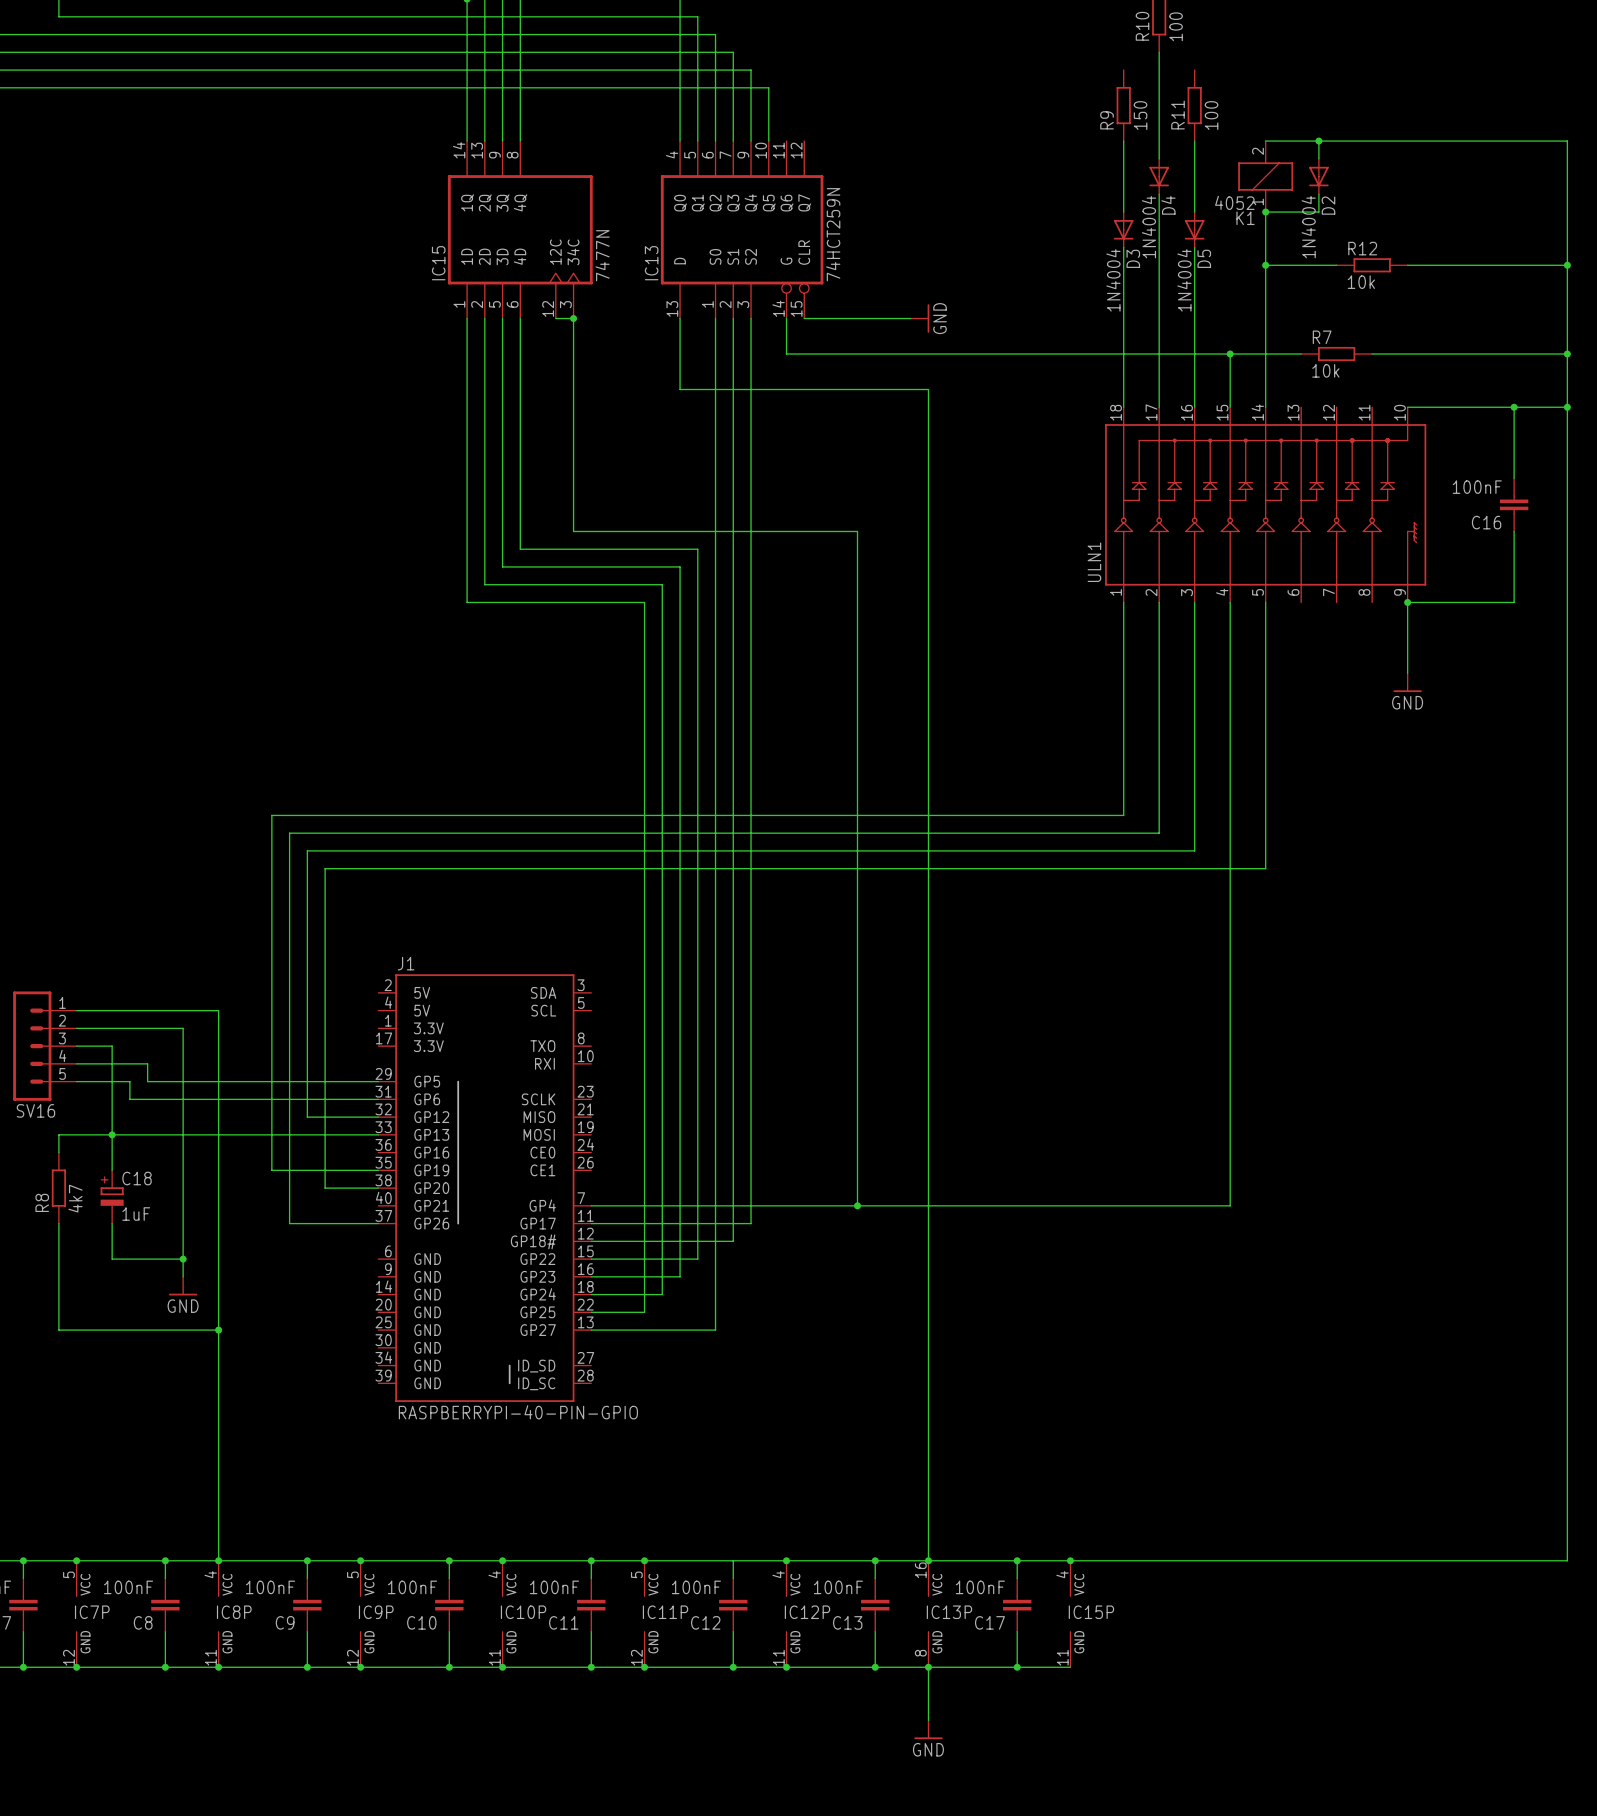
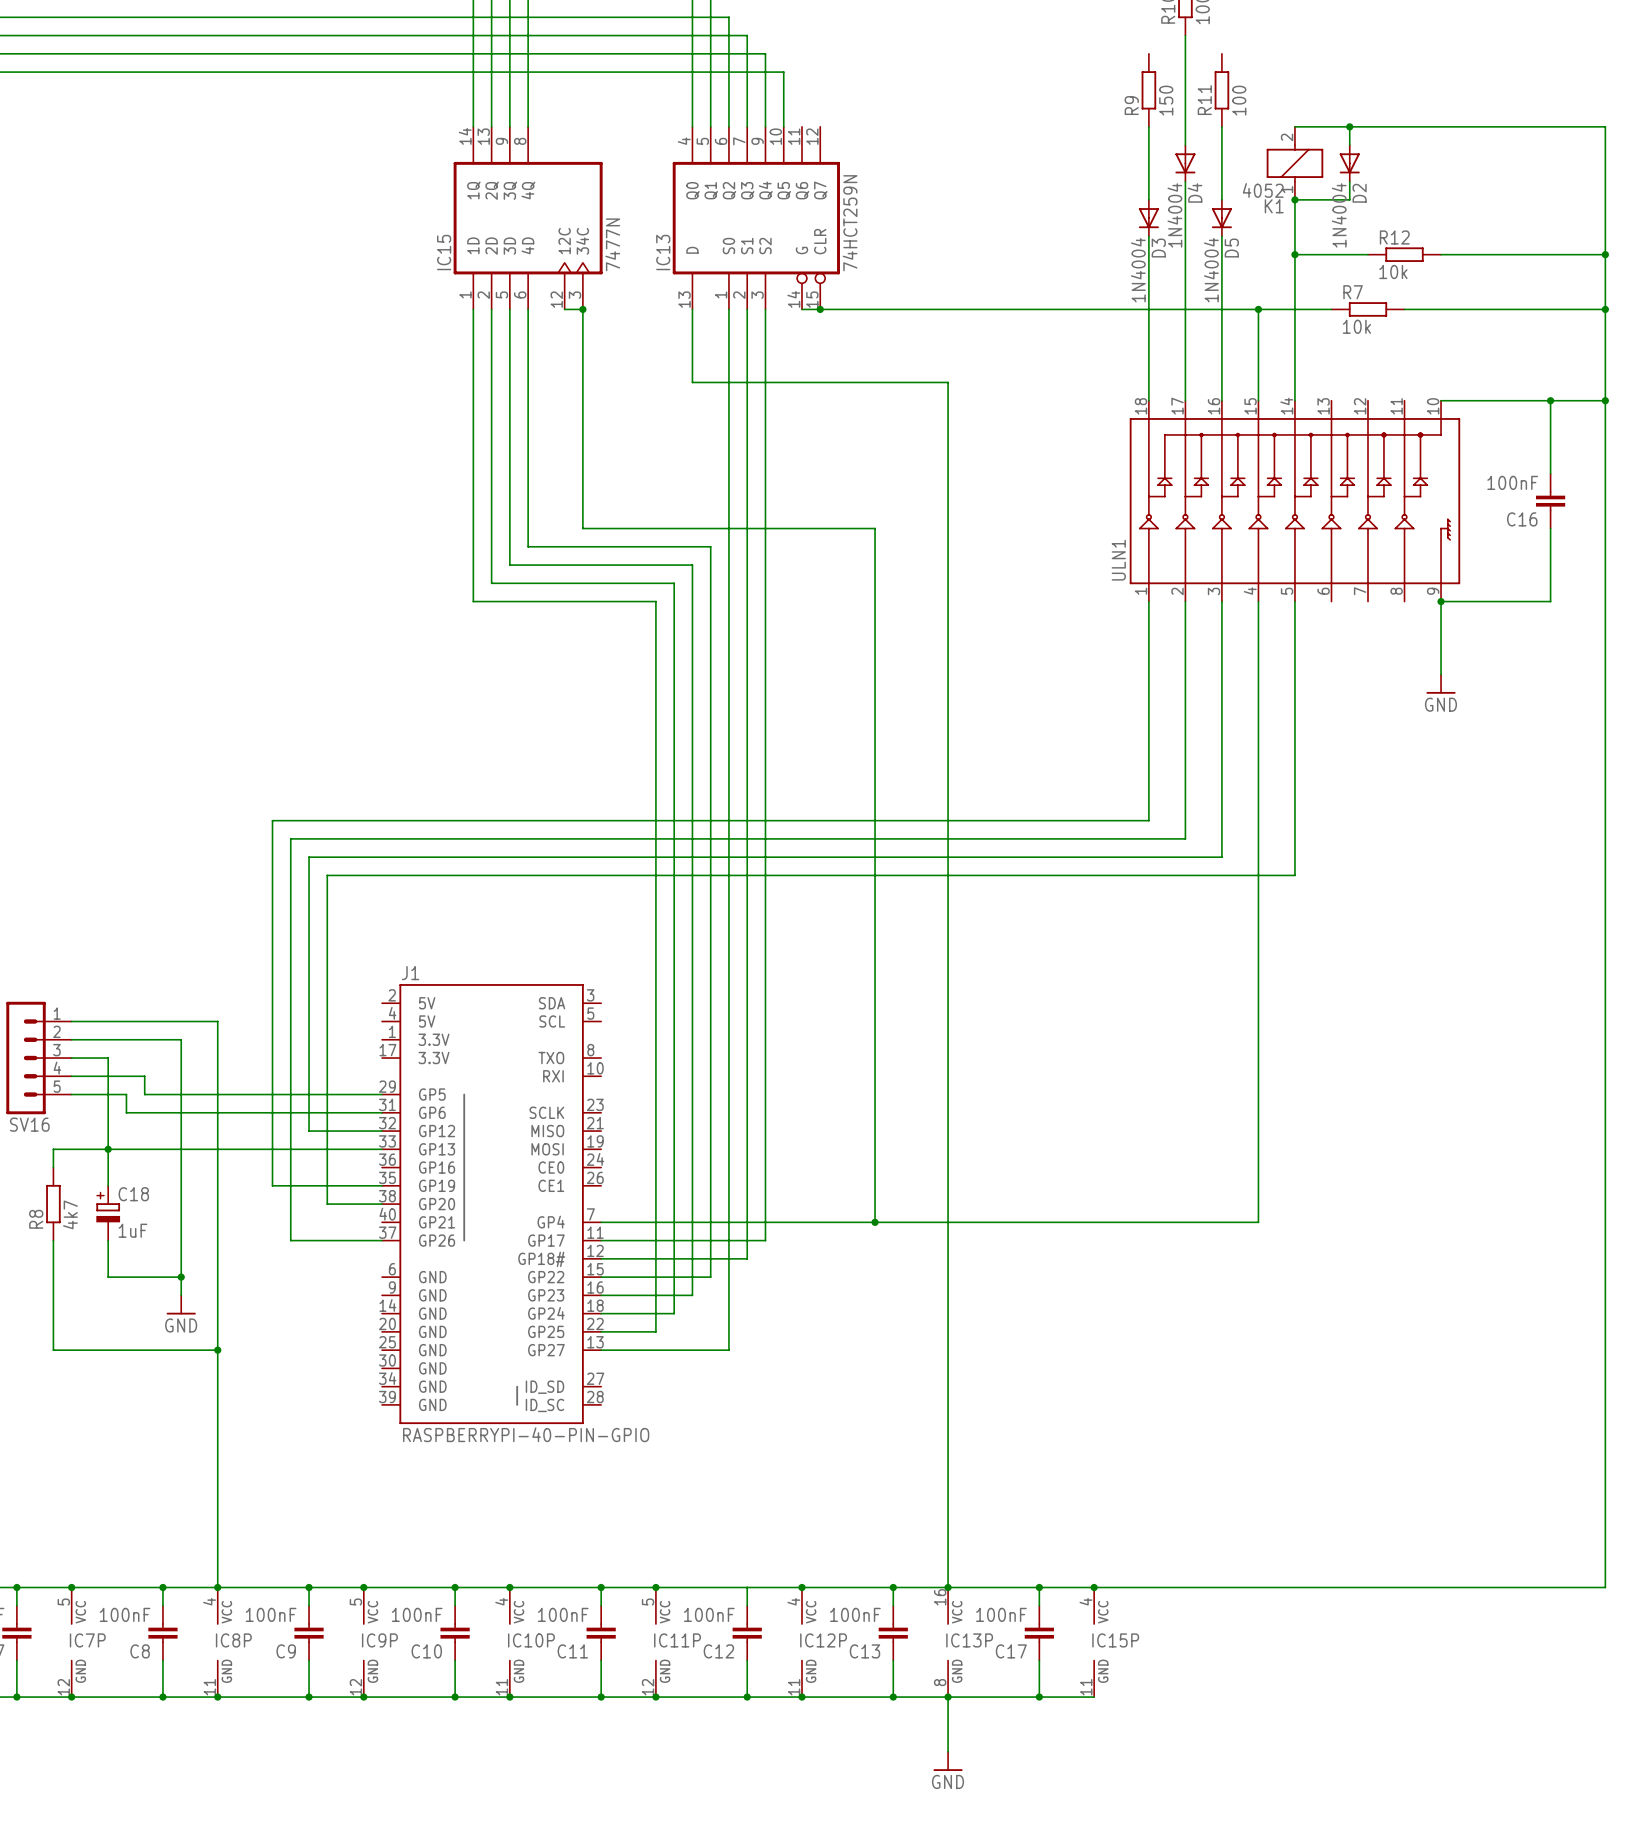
wire: (786, 318) (786, 354) (1301, 354) -> (801, 309) (820, 309)
junction: none -> (820, 309)
wire: none -> (929, 309) (1331, 309)
power symbol: GND (920, 318) -> none
wire: none -> (1258, 309) (1258, 345)
junction position: (1230, 354) -> (1258, 309)
R7 position: (1336, 354) -> (1368, 309)
wire: (1372, 354) (1567, 354) -> (1404, 309) (1605, 309)
junction position: (1567, 354) -> (1605, 309)

